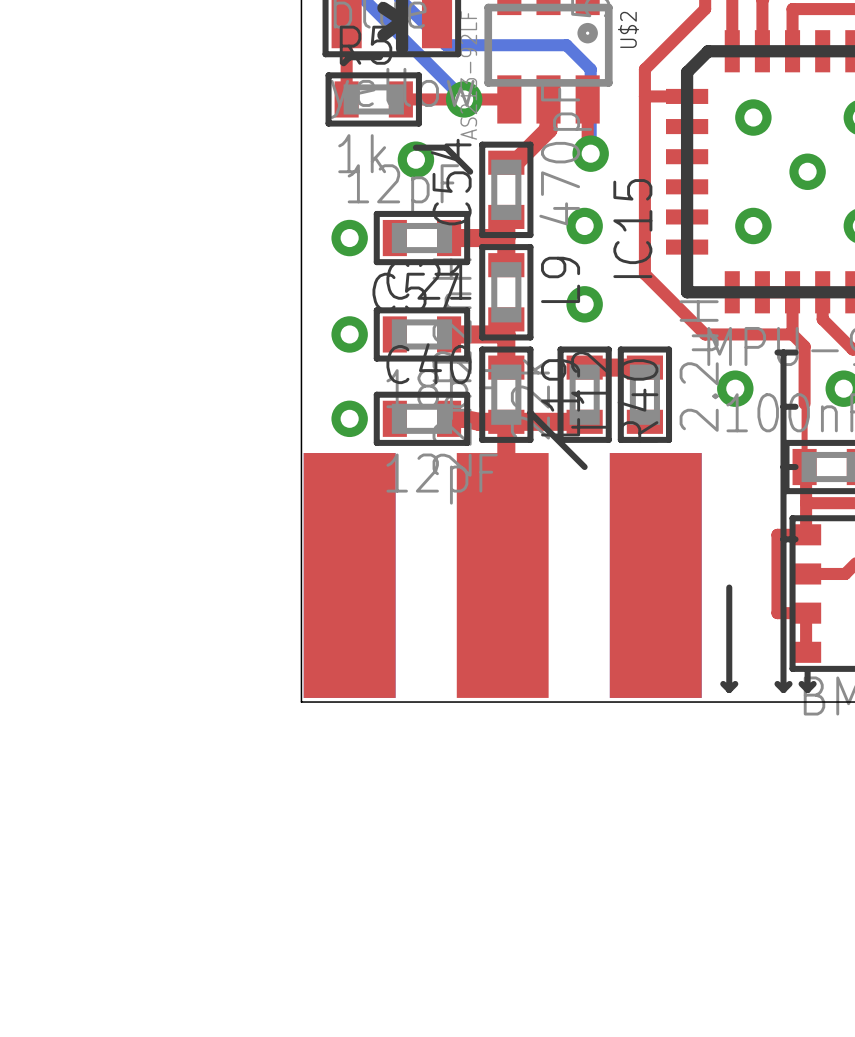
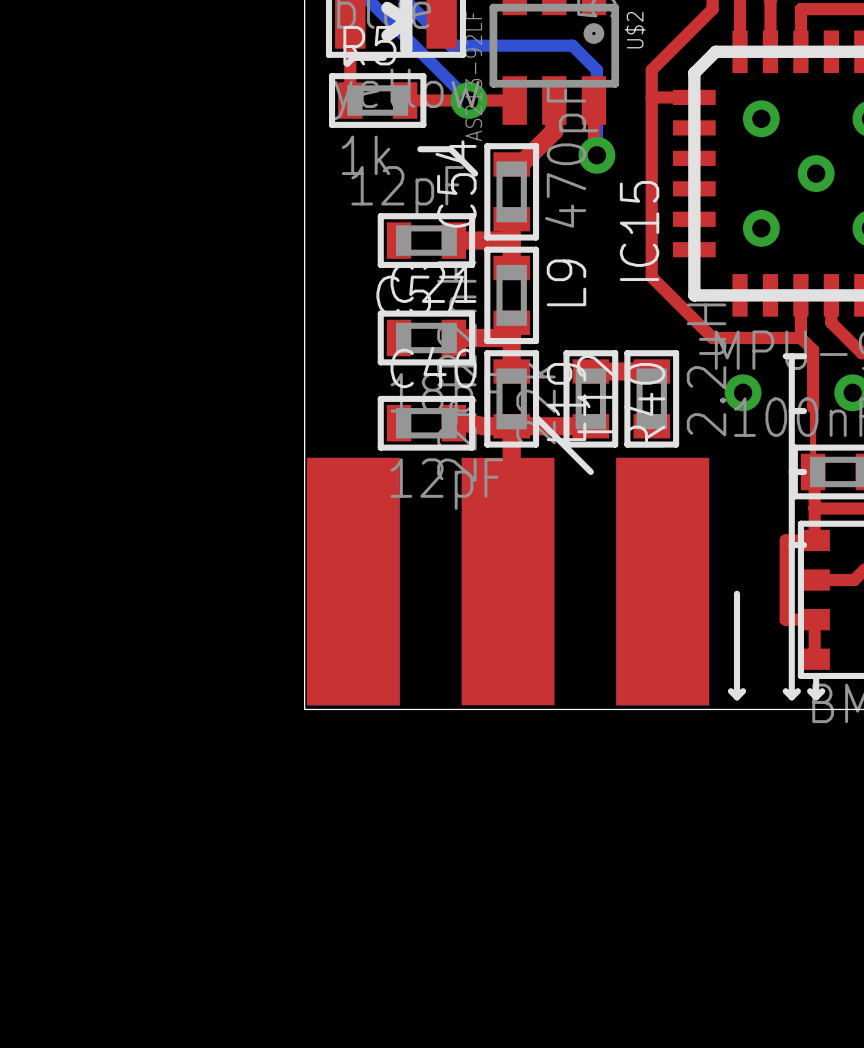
via: (415, 159) -> none
via: (584, 225) -> none
via: (349, 238) -> none
via: (584, 304) -> none
via: (349, 334) -> none
via: (349, 418) -> none

